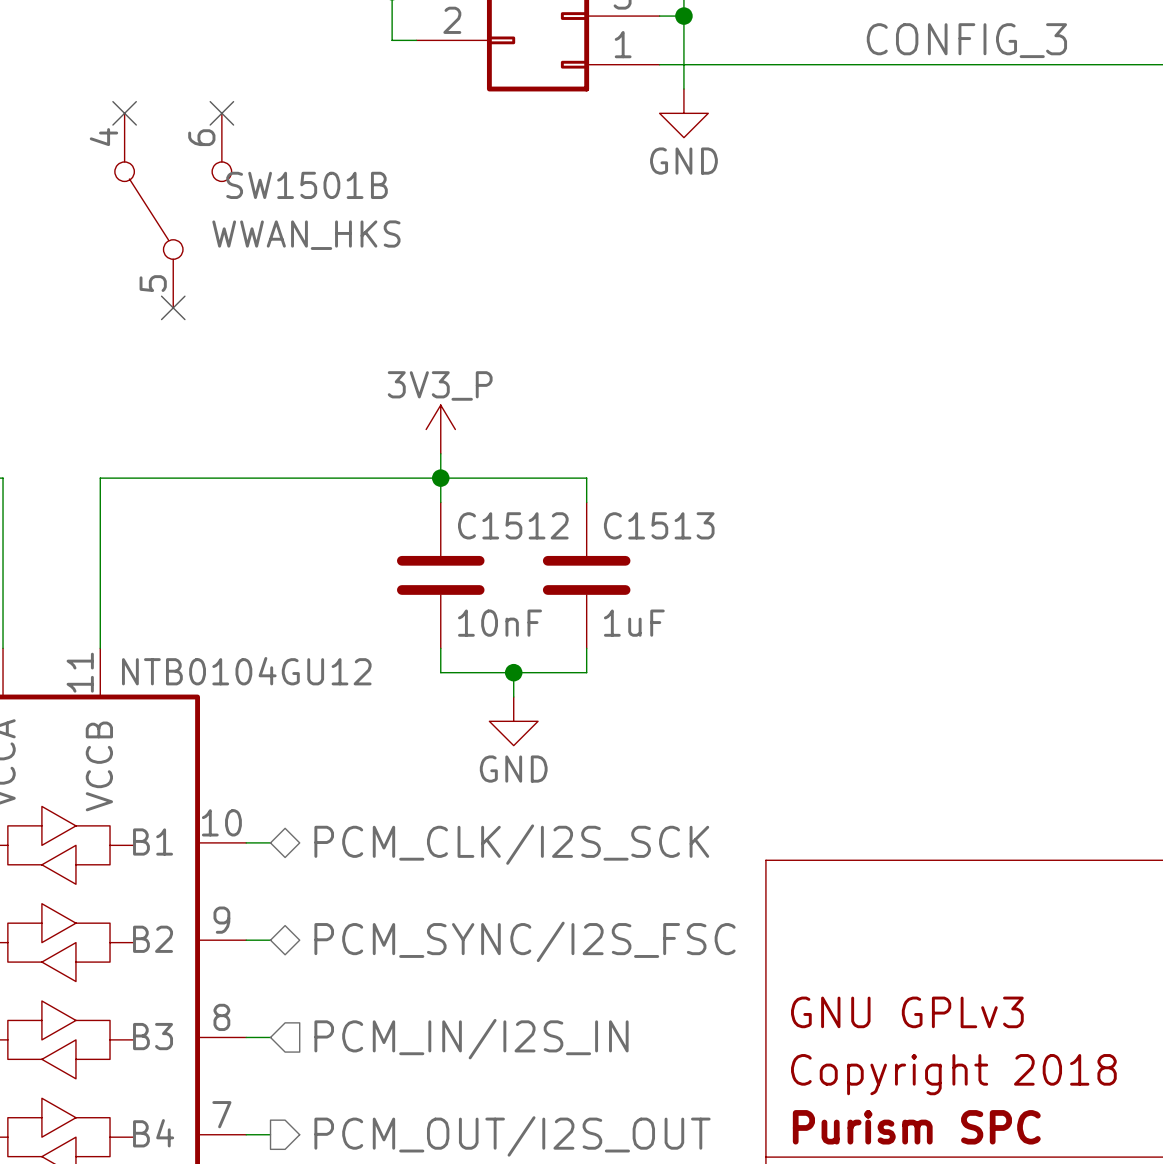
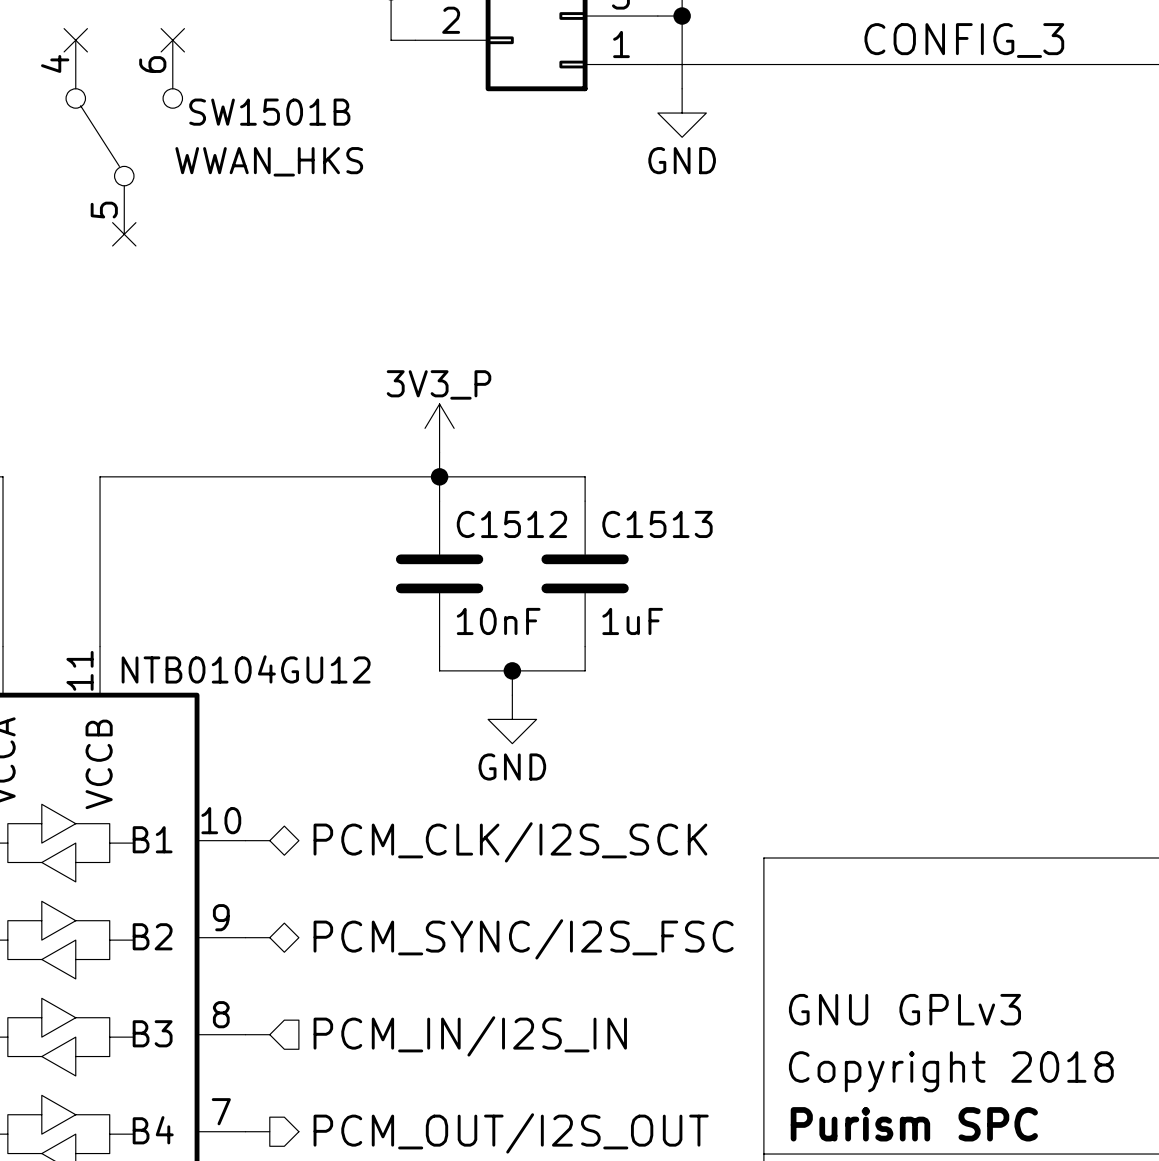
no-connect mark: none -> (75, 40)
no-connect mark: none -> (172, 40)
no-connect mark: (124, 113) -> none
no-connect mark: (221, 113) -> none
SW1501B name position: SW1501B (307, 185) -> SW1501B (269, 112)
SW1501B position: (173, 210) -> (124, 137)
no-connect mark: none -> (124, 234)
SW1501B value position: WWAN_HKS (306, 235) -> WWAN_HKS (269, 161)
no-connect mark: (173, 307) -> none

